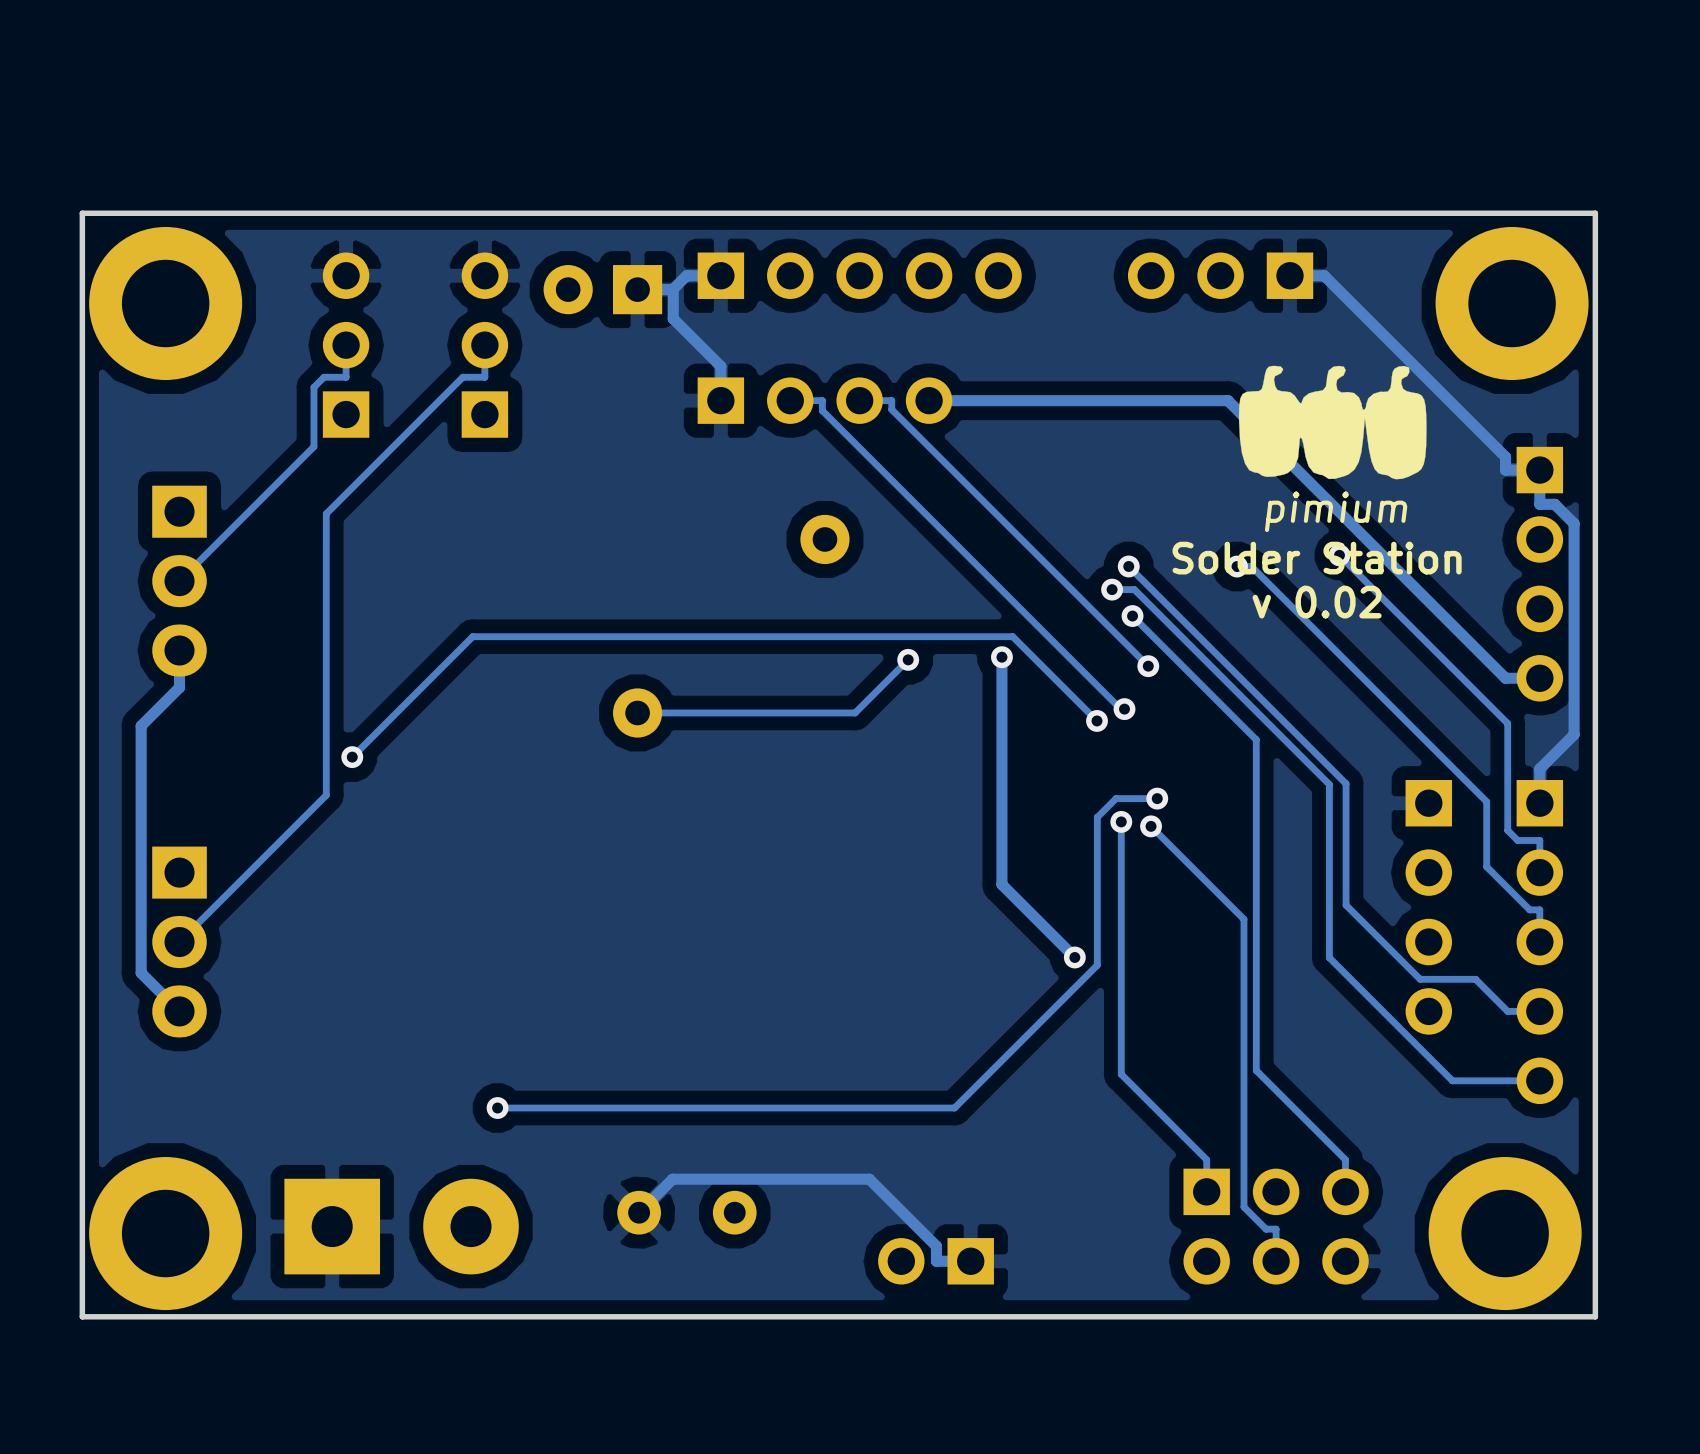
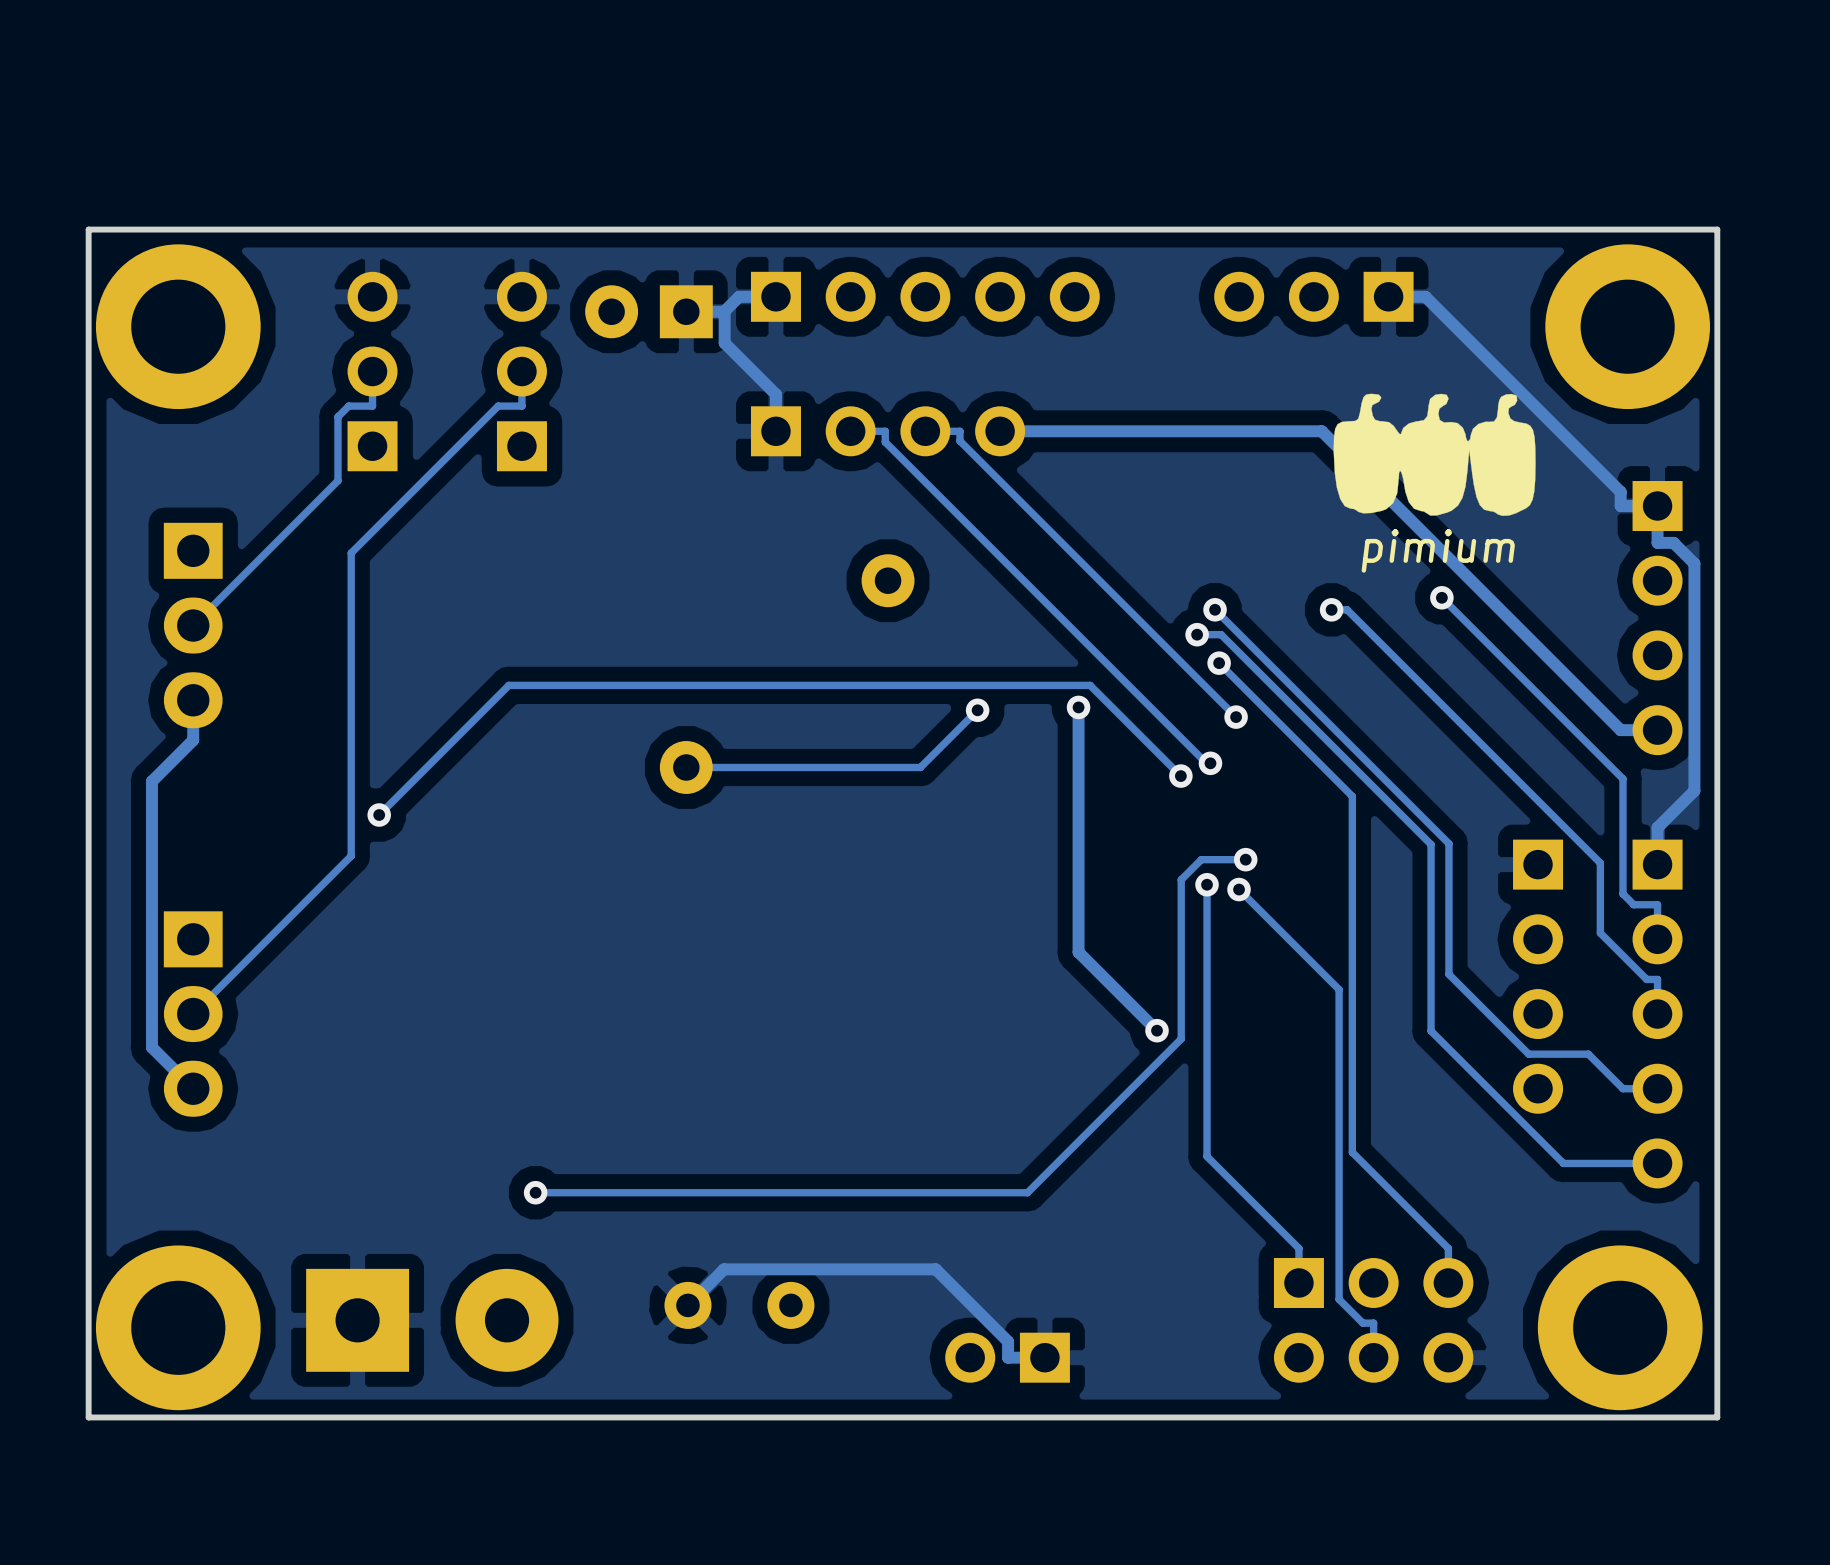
text: Solder Station (1317, 558) -> none
text: v 0.02 (1317, 602) -> none

